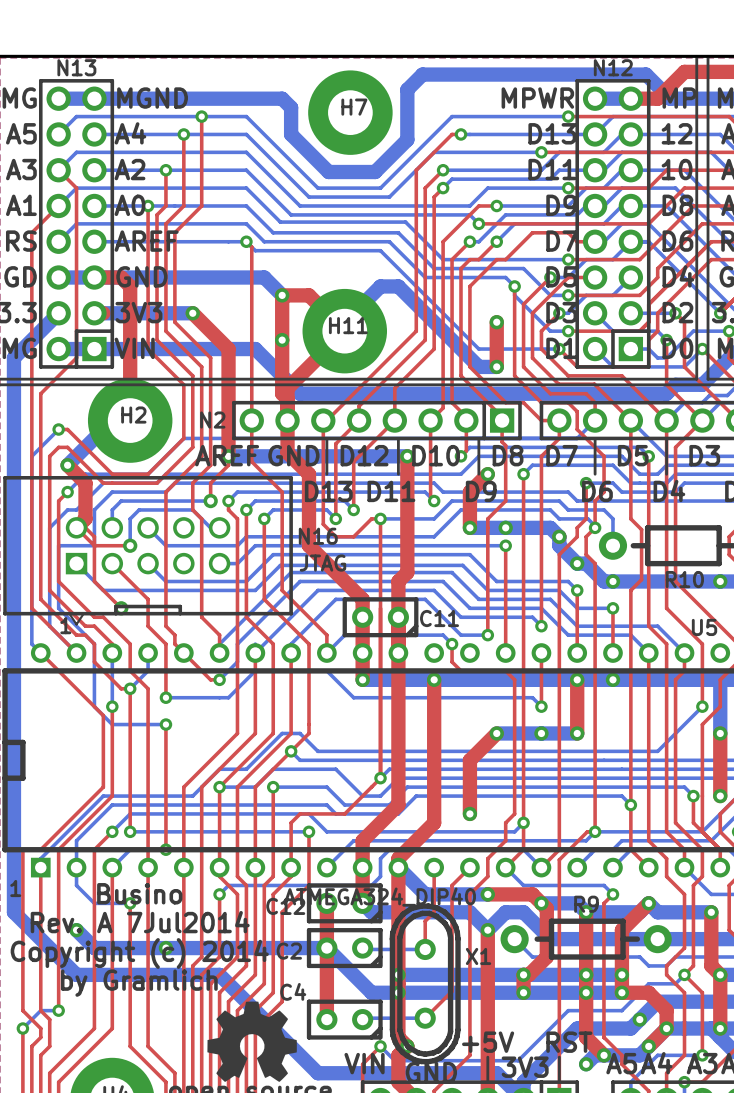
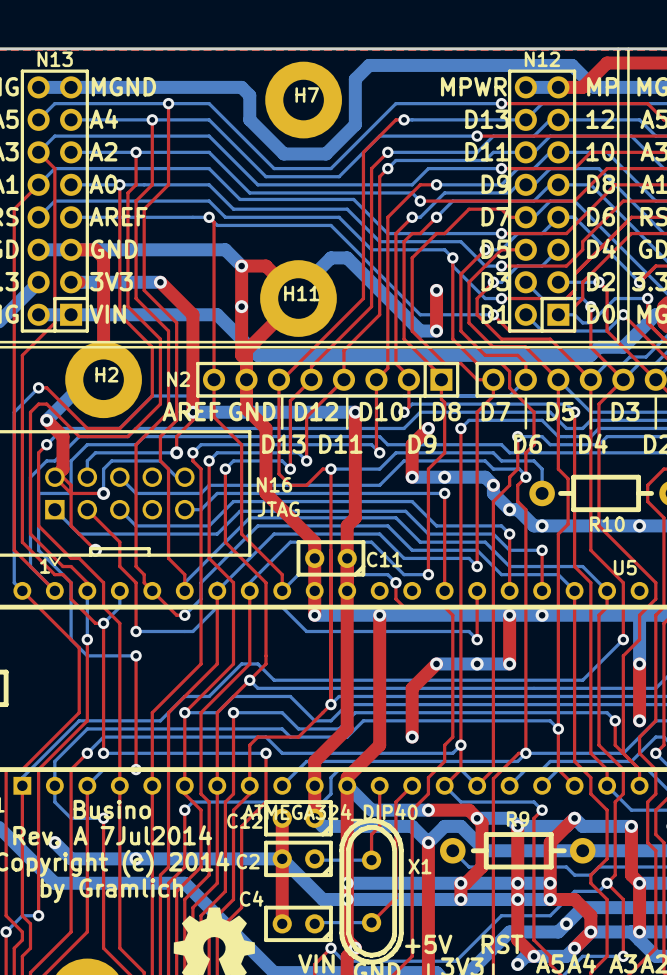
line: (487, 1057) (487, 1064) -> none
line: (559, 1057) (559, 1064) -> none

